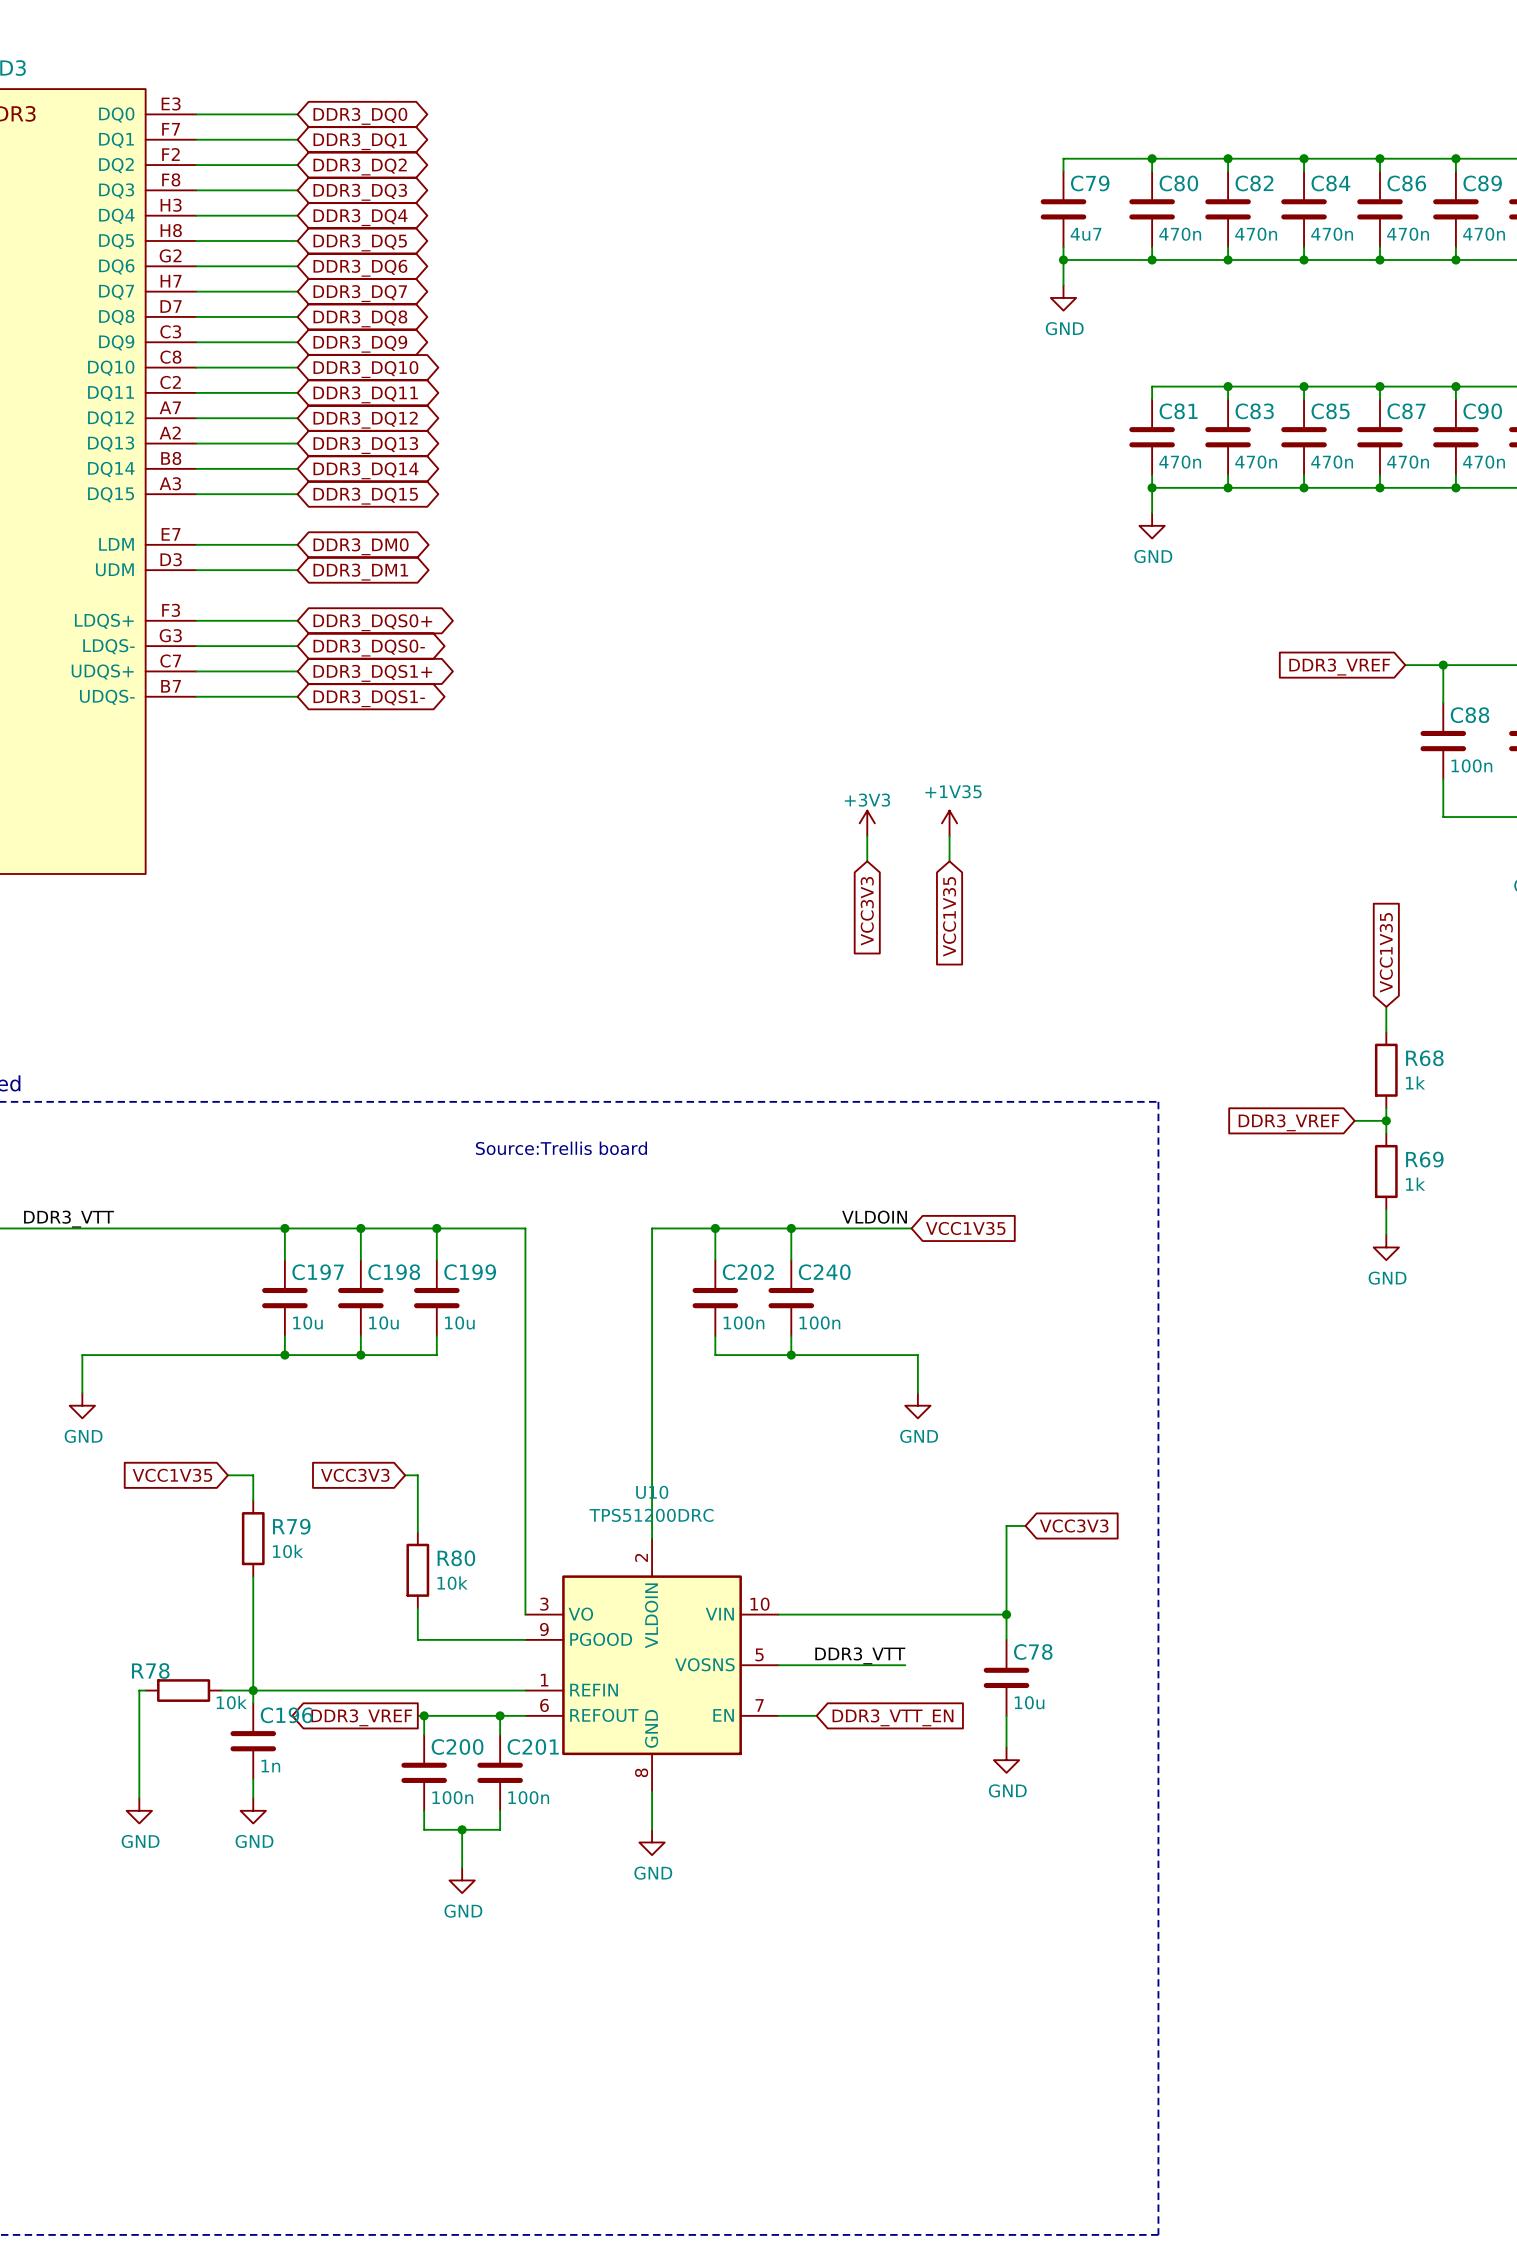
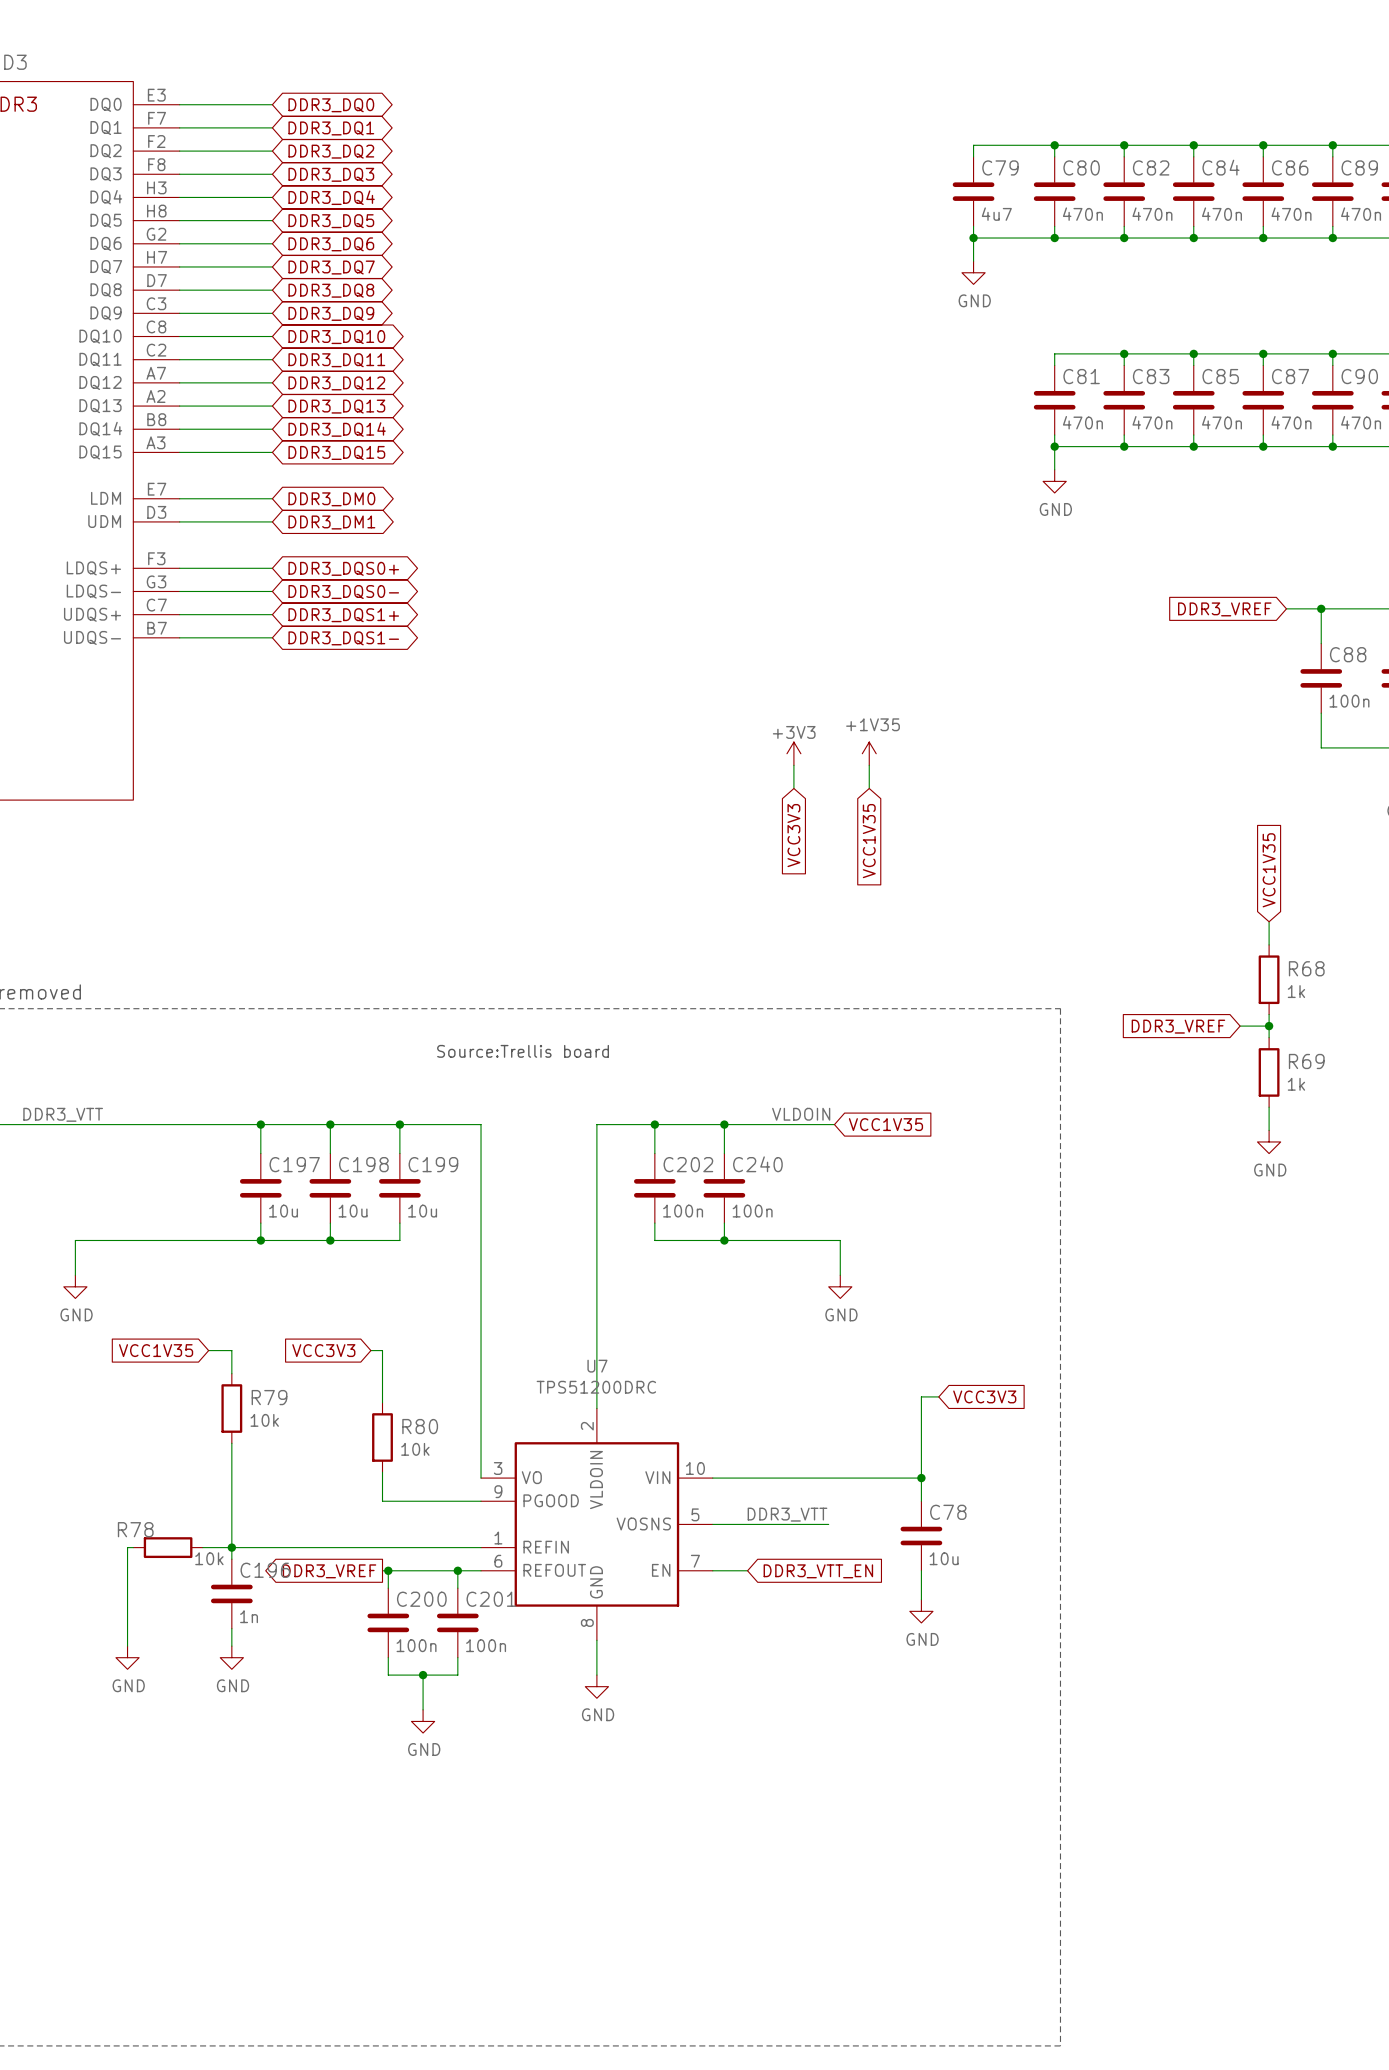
U10 name: U10 (652, 1492) -> U7 (597, 1366)

